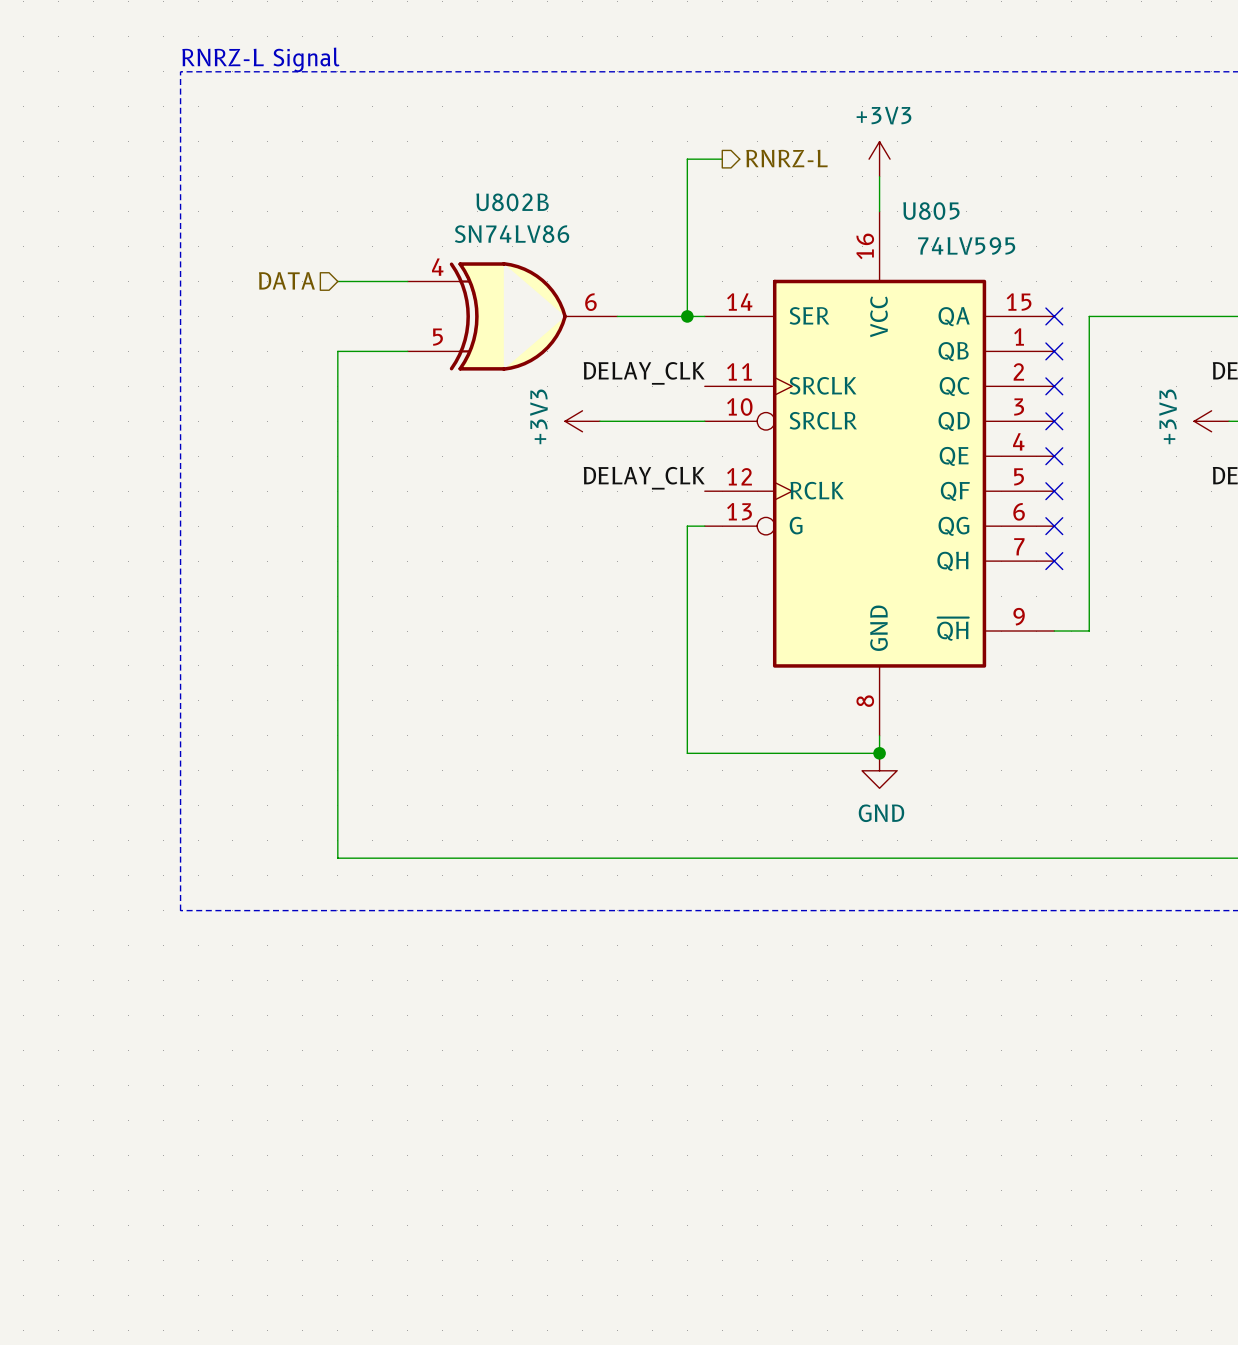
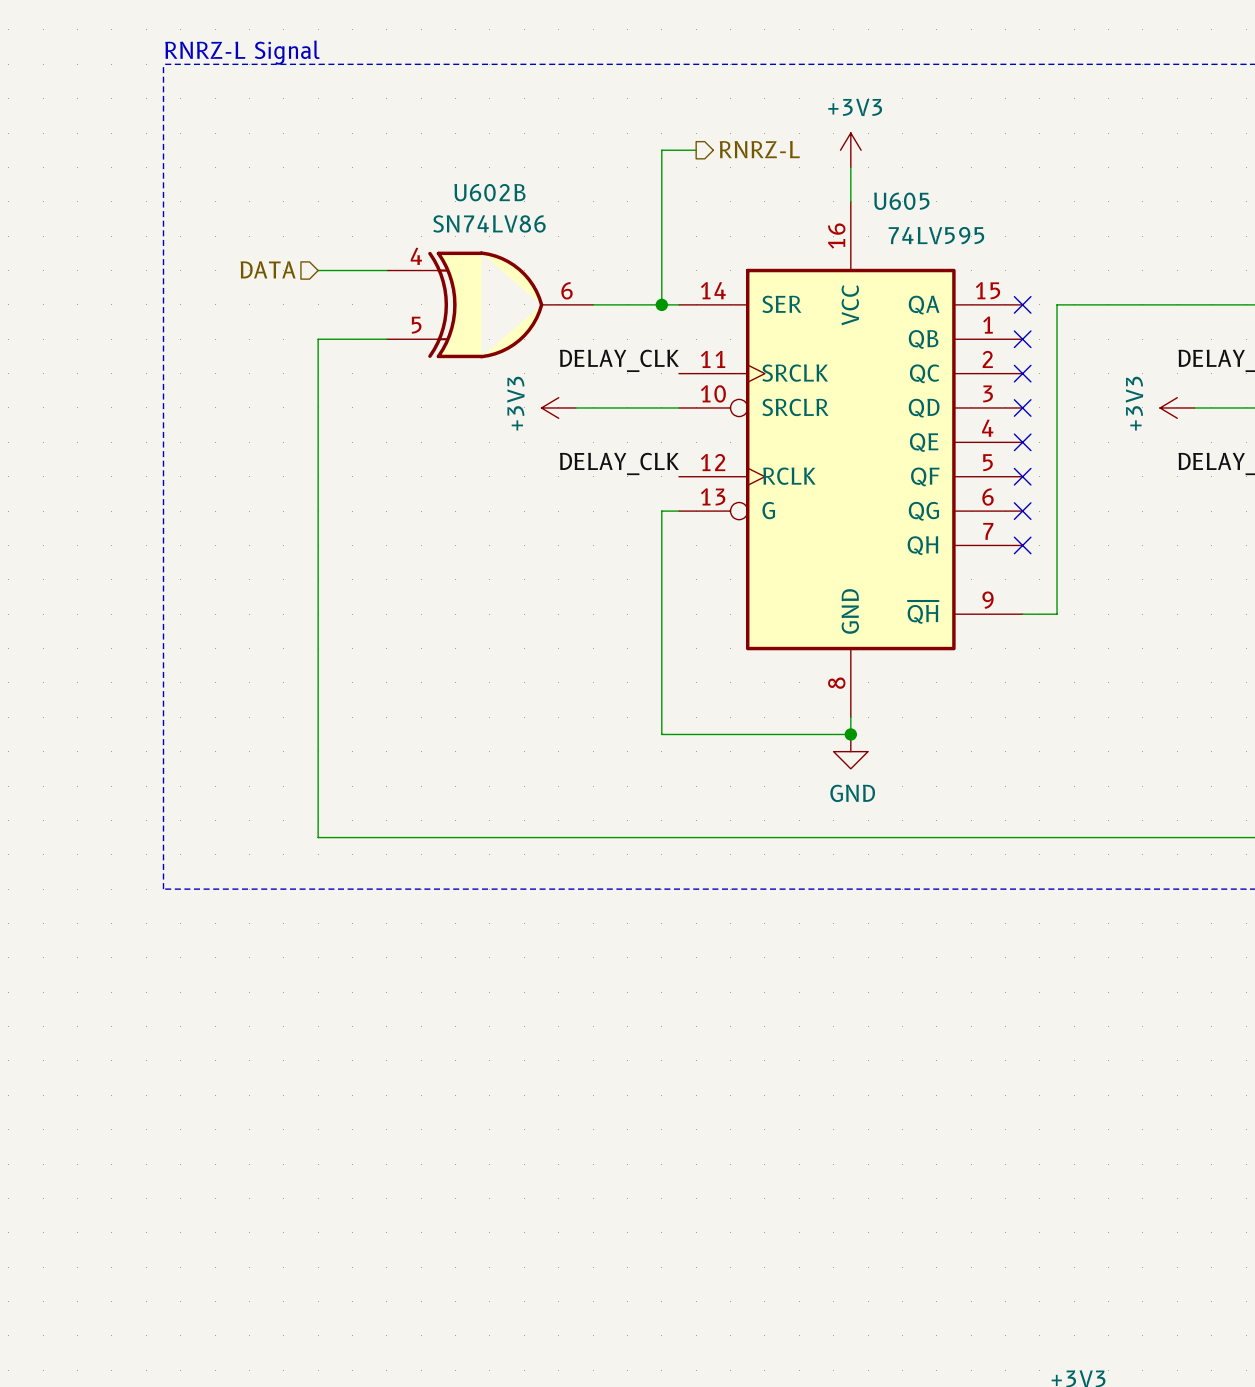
U802B name: U802B (512, 202) -> U602B (489, 192)
U805 name: U805 (931, 211) -> U605 (901, 201)

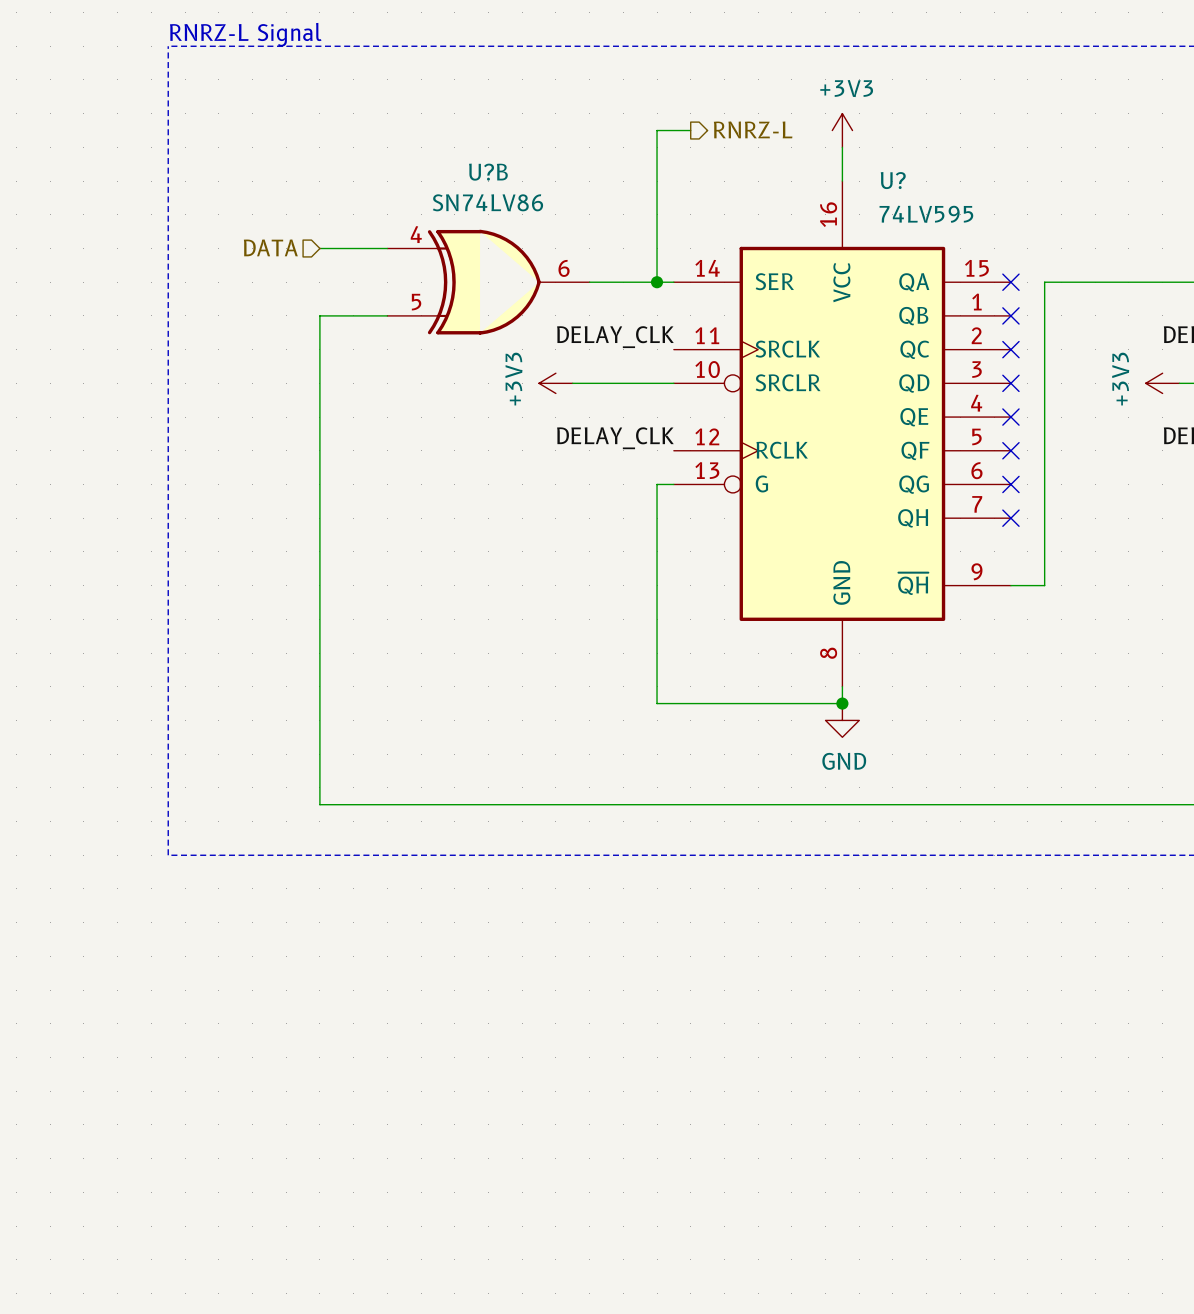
U602B name: U602B (489, 192) -> U?B (488, 172)
U605 name: U605 (901, 201) -> U? (893, 180)

